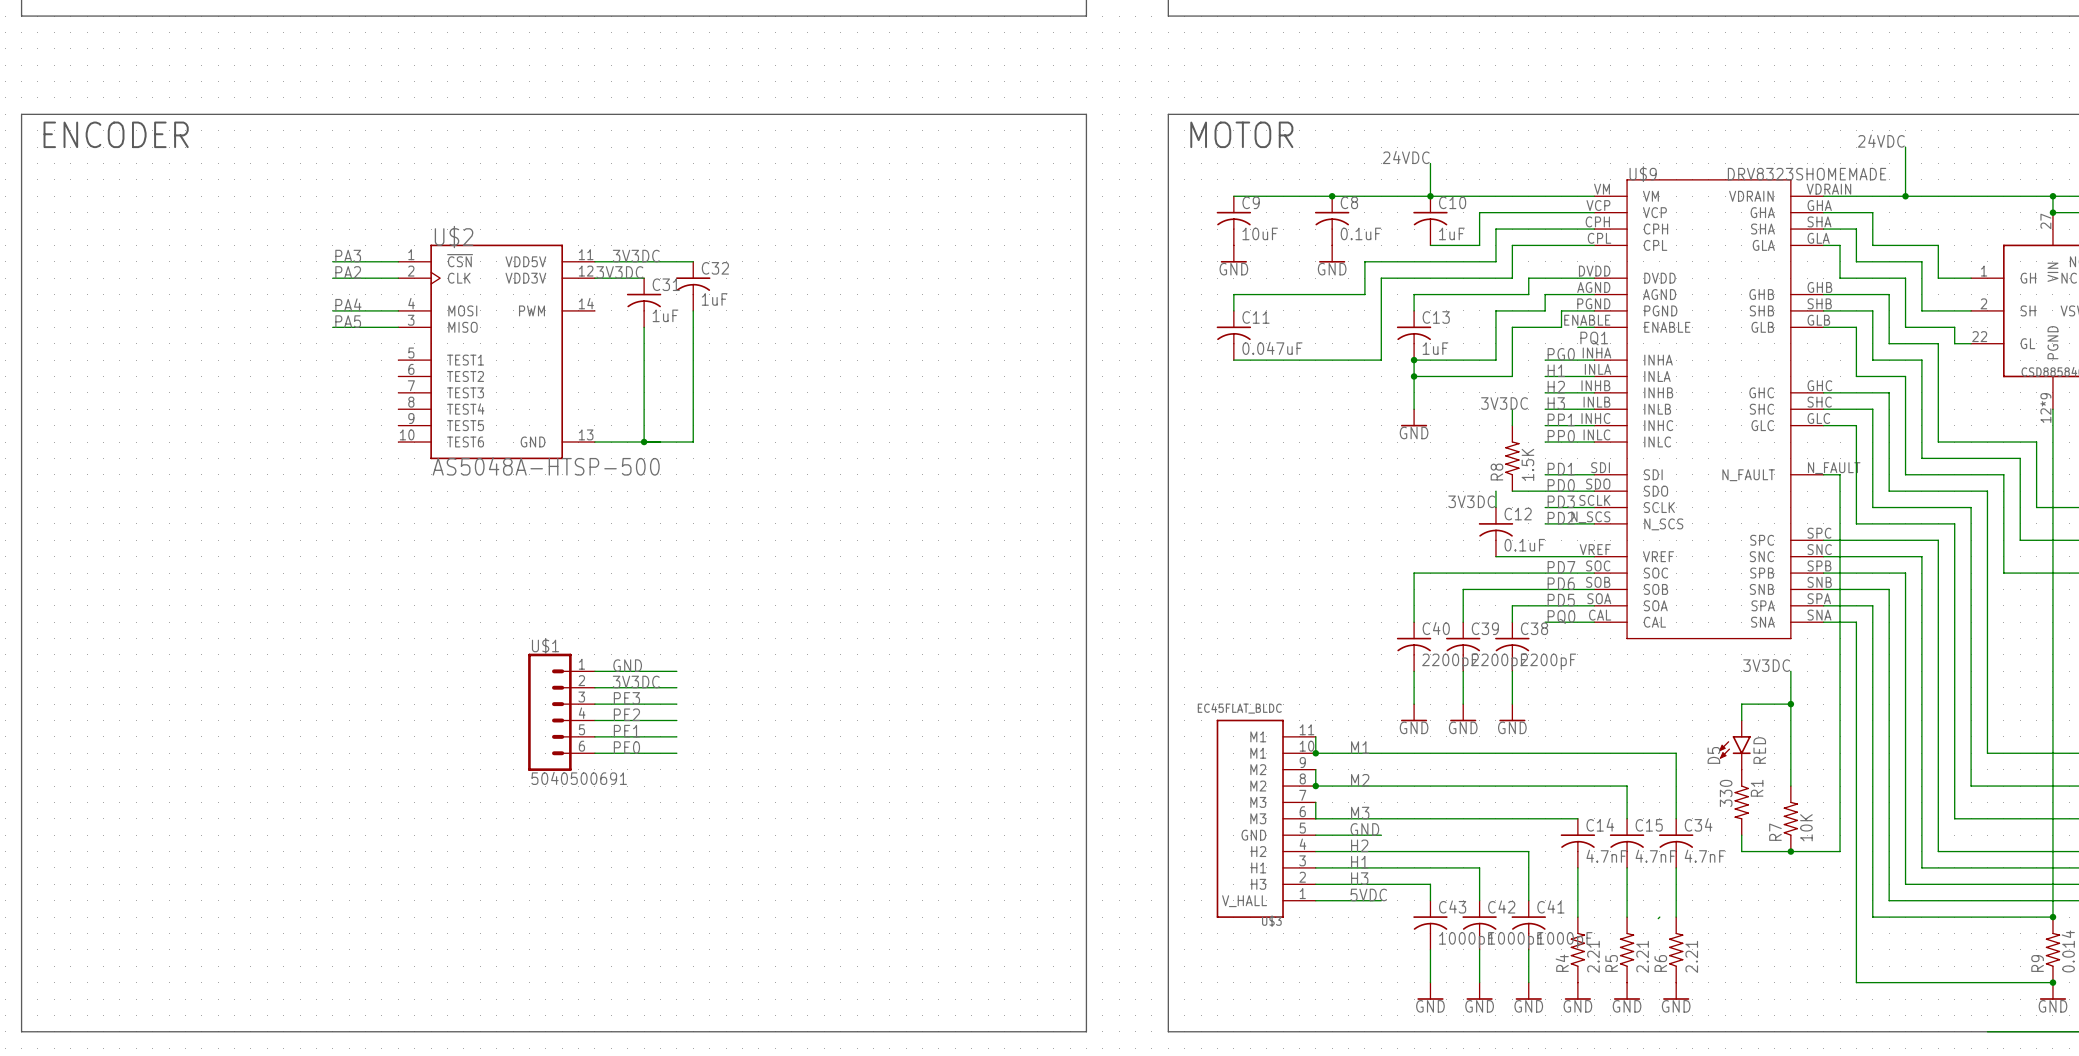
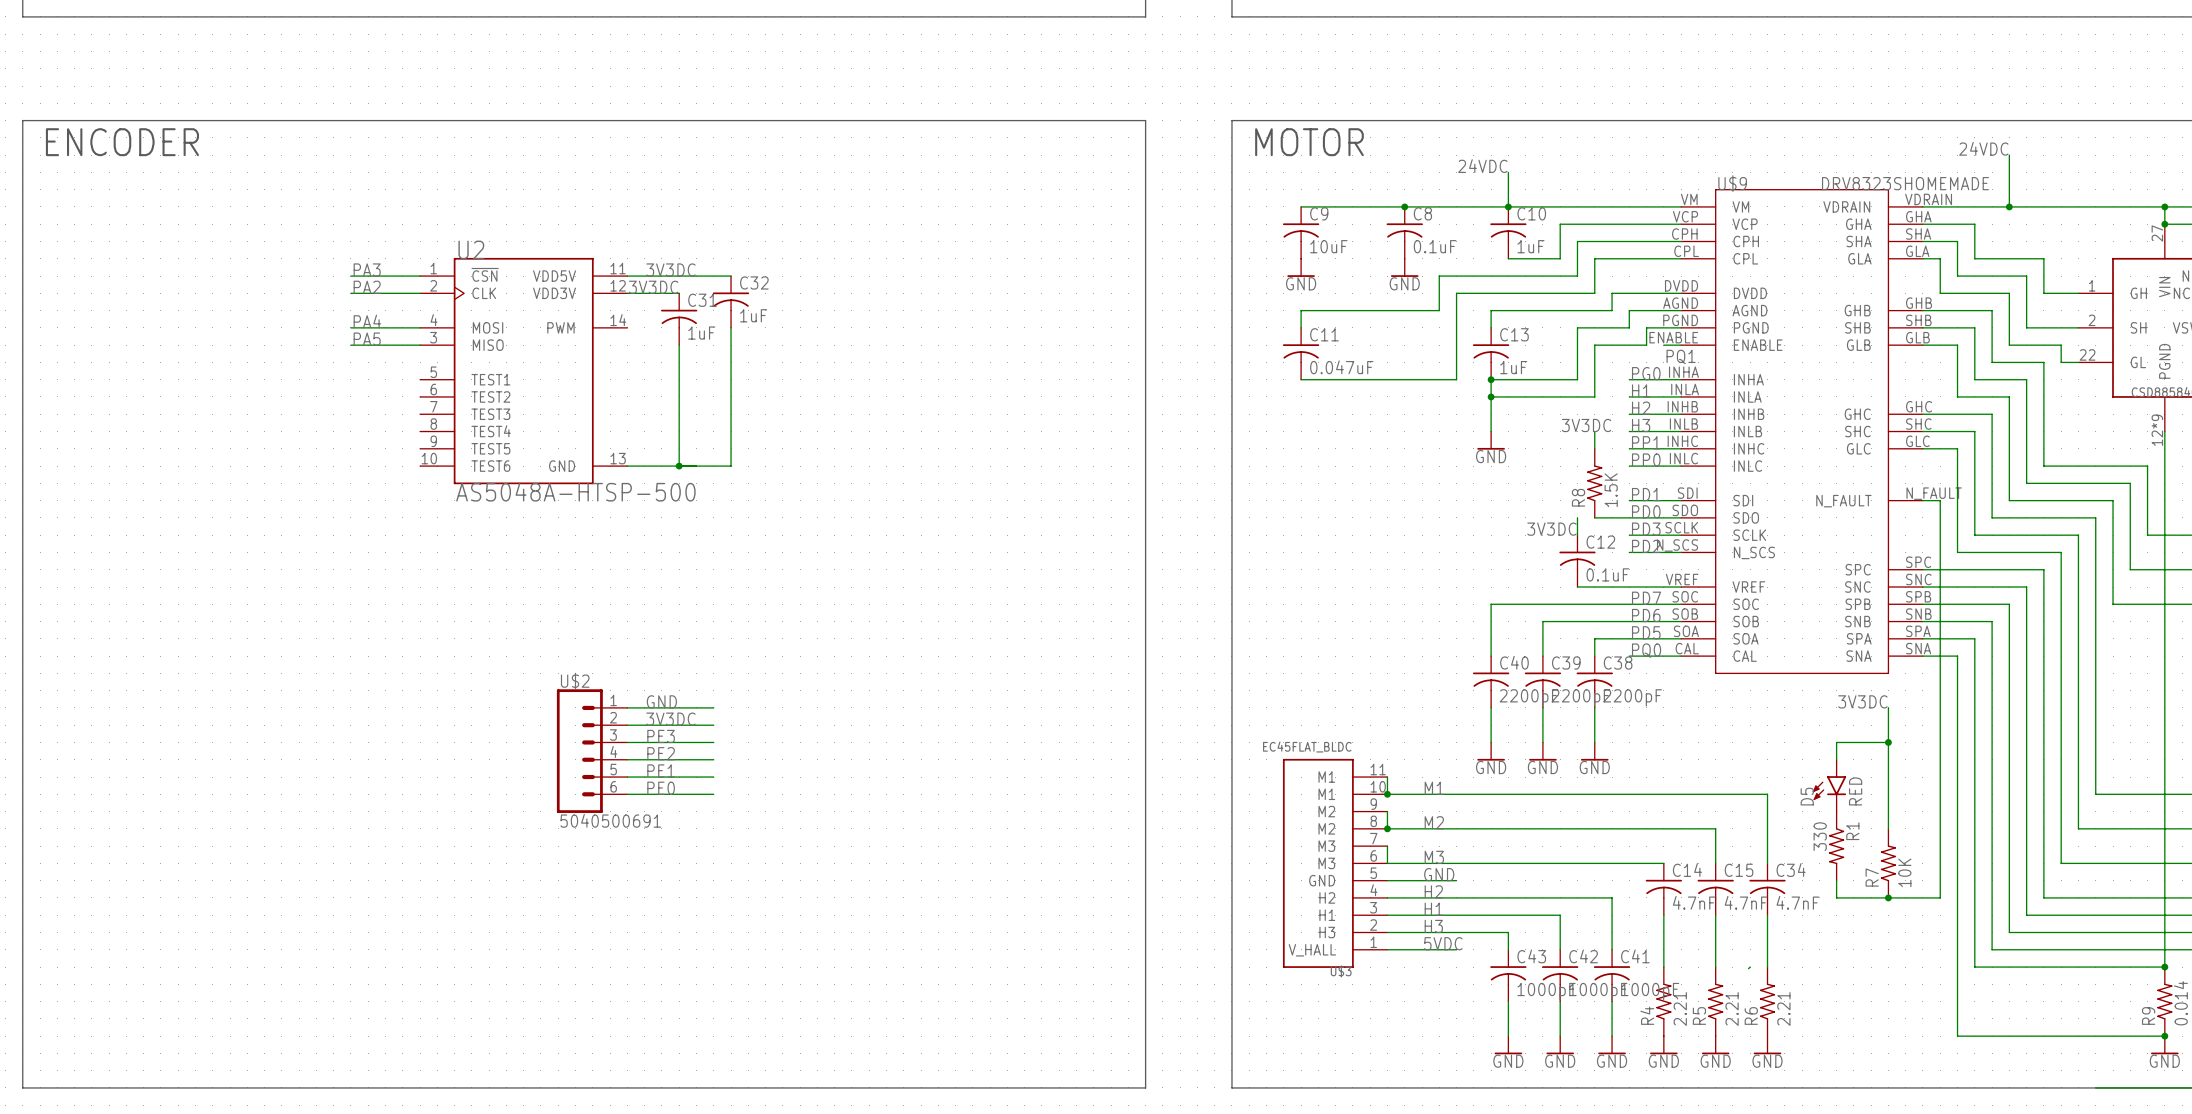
U$2 name: U$2 (454, 237) -> U2 (471, 249)
U$1 name: U$1 (545, 645) -> U$2 (575, 681)

